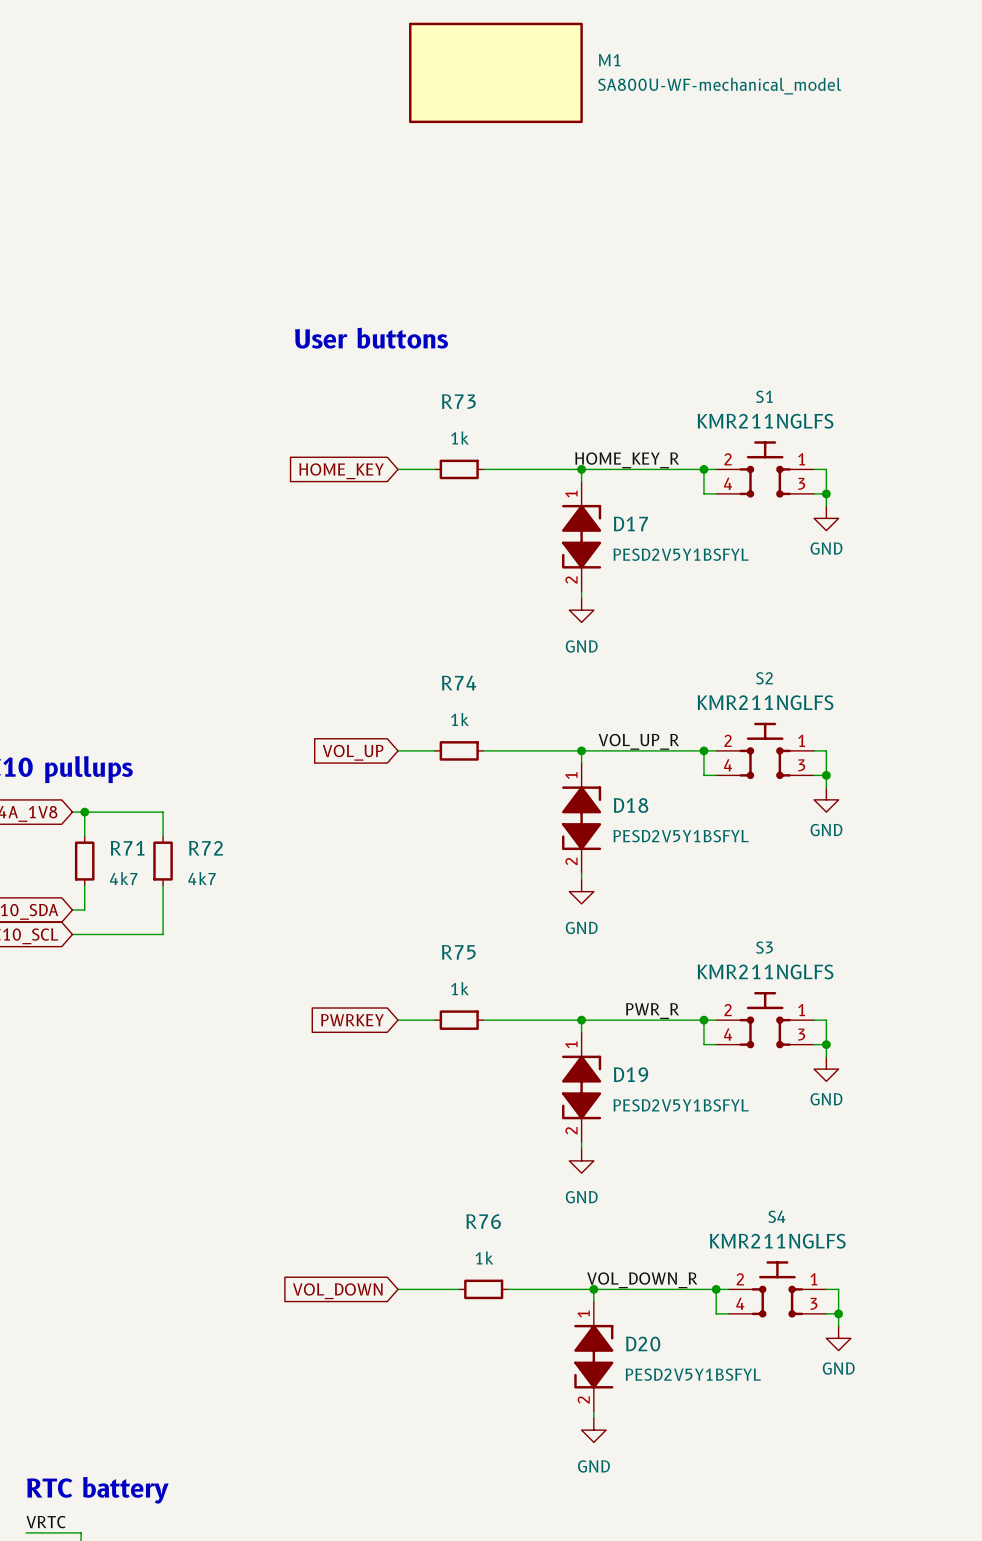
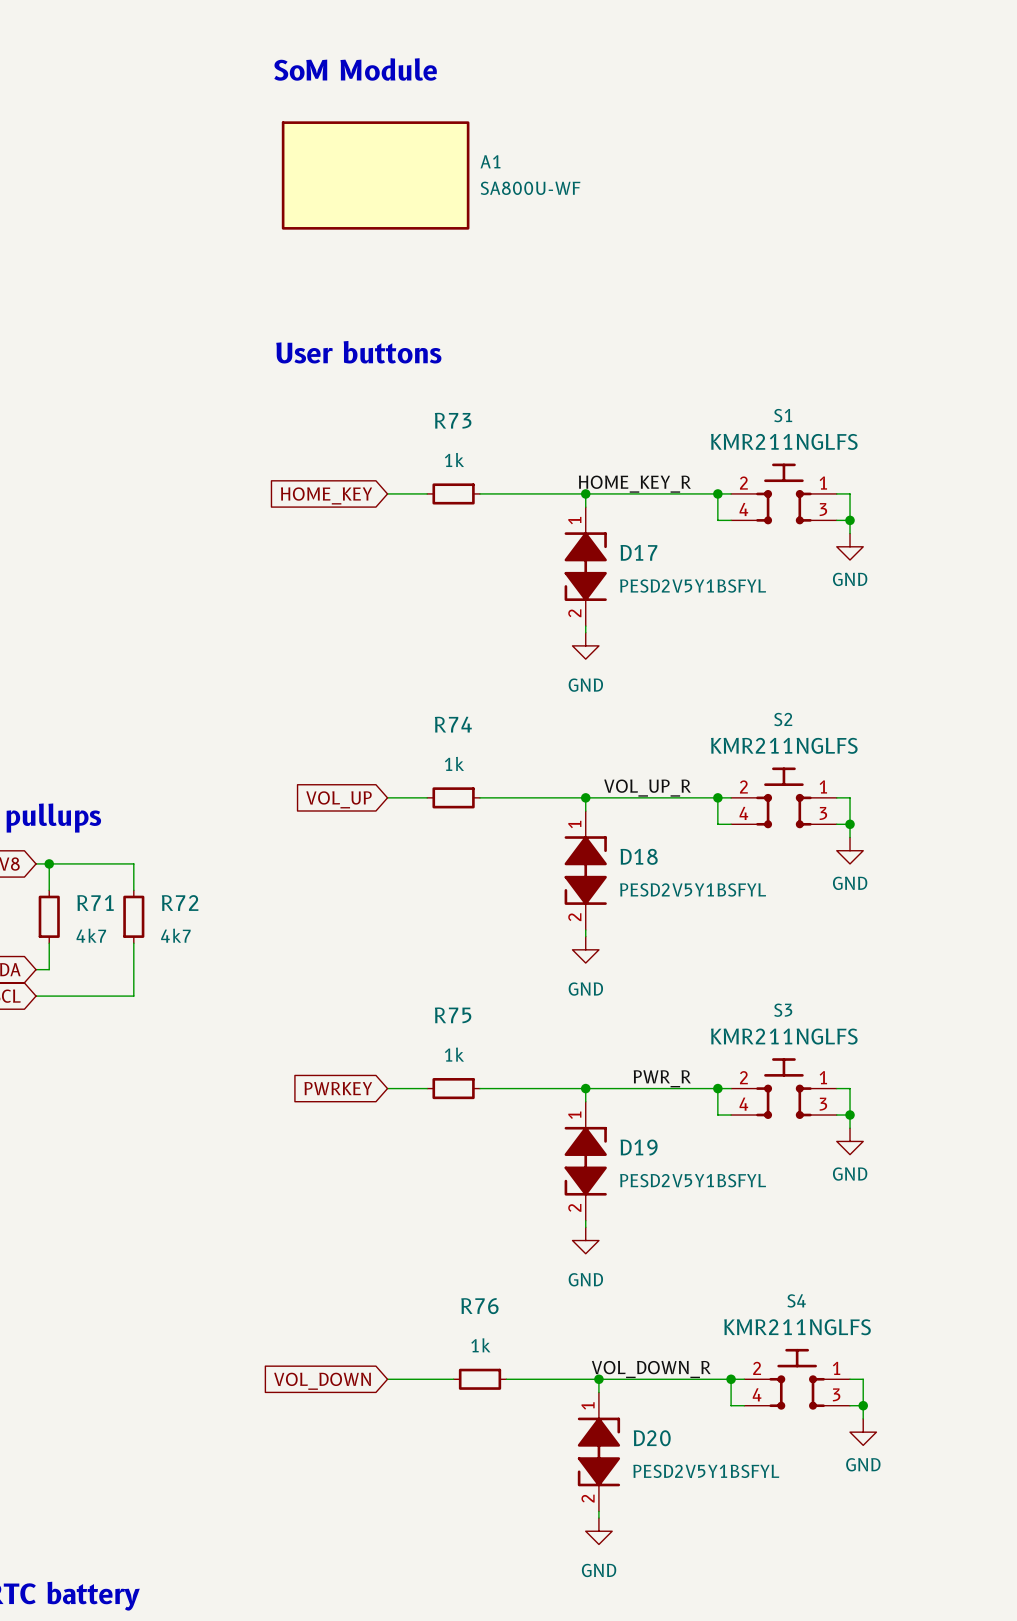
M1: SA800U-WF-mechanical_model (495, 72) -> none
text: none -> SoM Module (355, 69)
A1: none -> SA800U-WF (375, 175)

